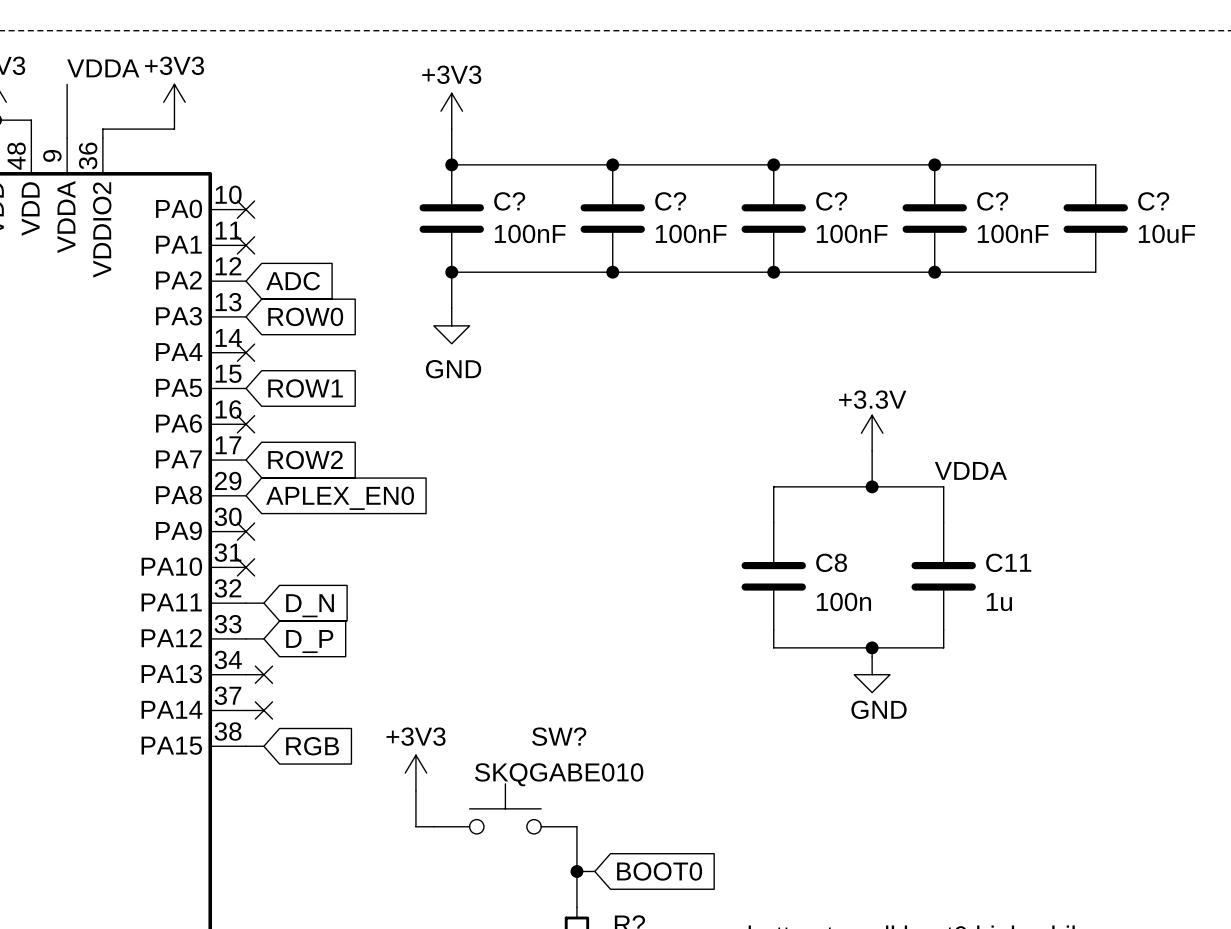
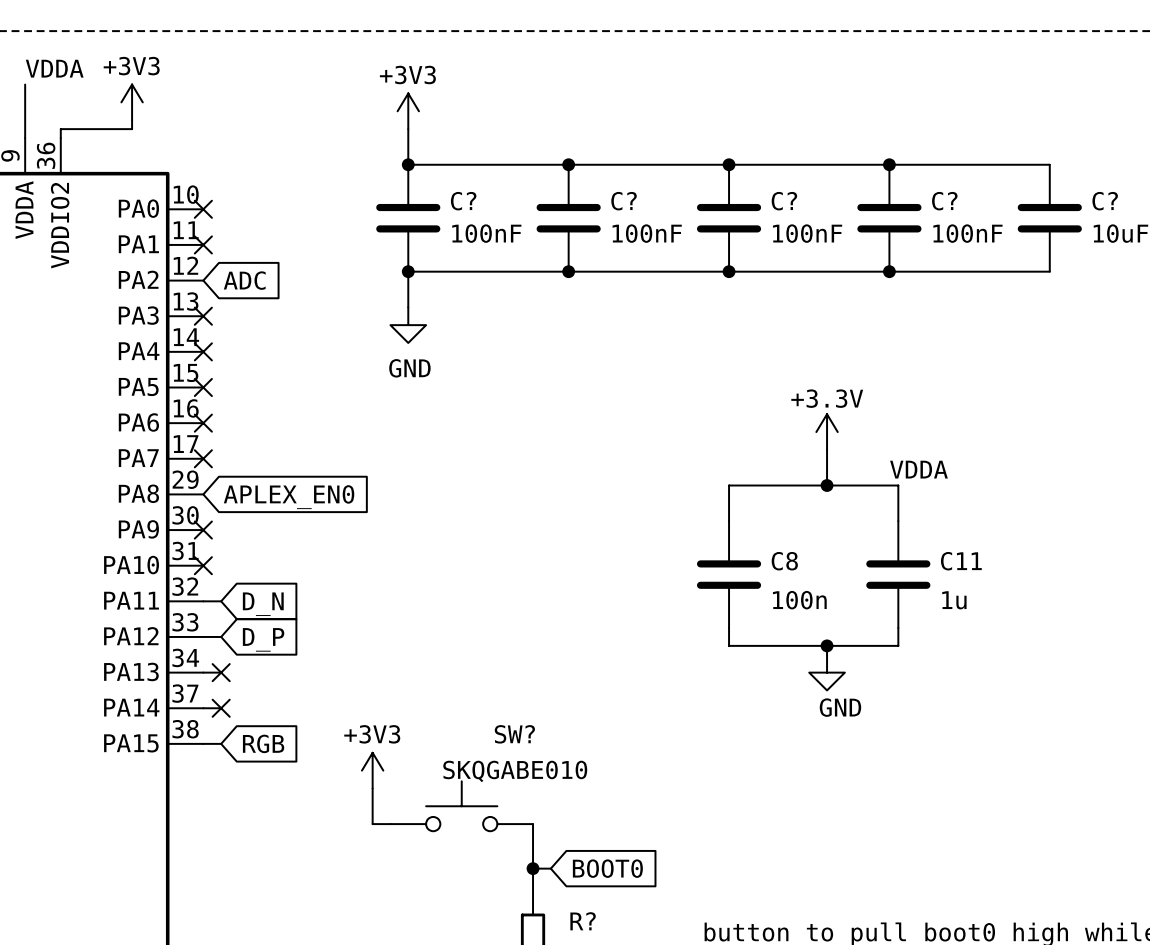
no-connect mark: none -> (203, 316)
global label: ROW0 (305, 316) -> none
no-connect mark: none -> (203, 387)
global label: ROW1 (305, 388) -> none
no-connect mark: none -> (203, 458)
global label: ROW2 (305, 460) -> none

